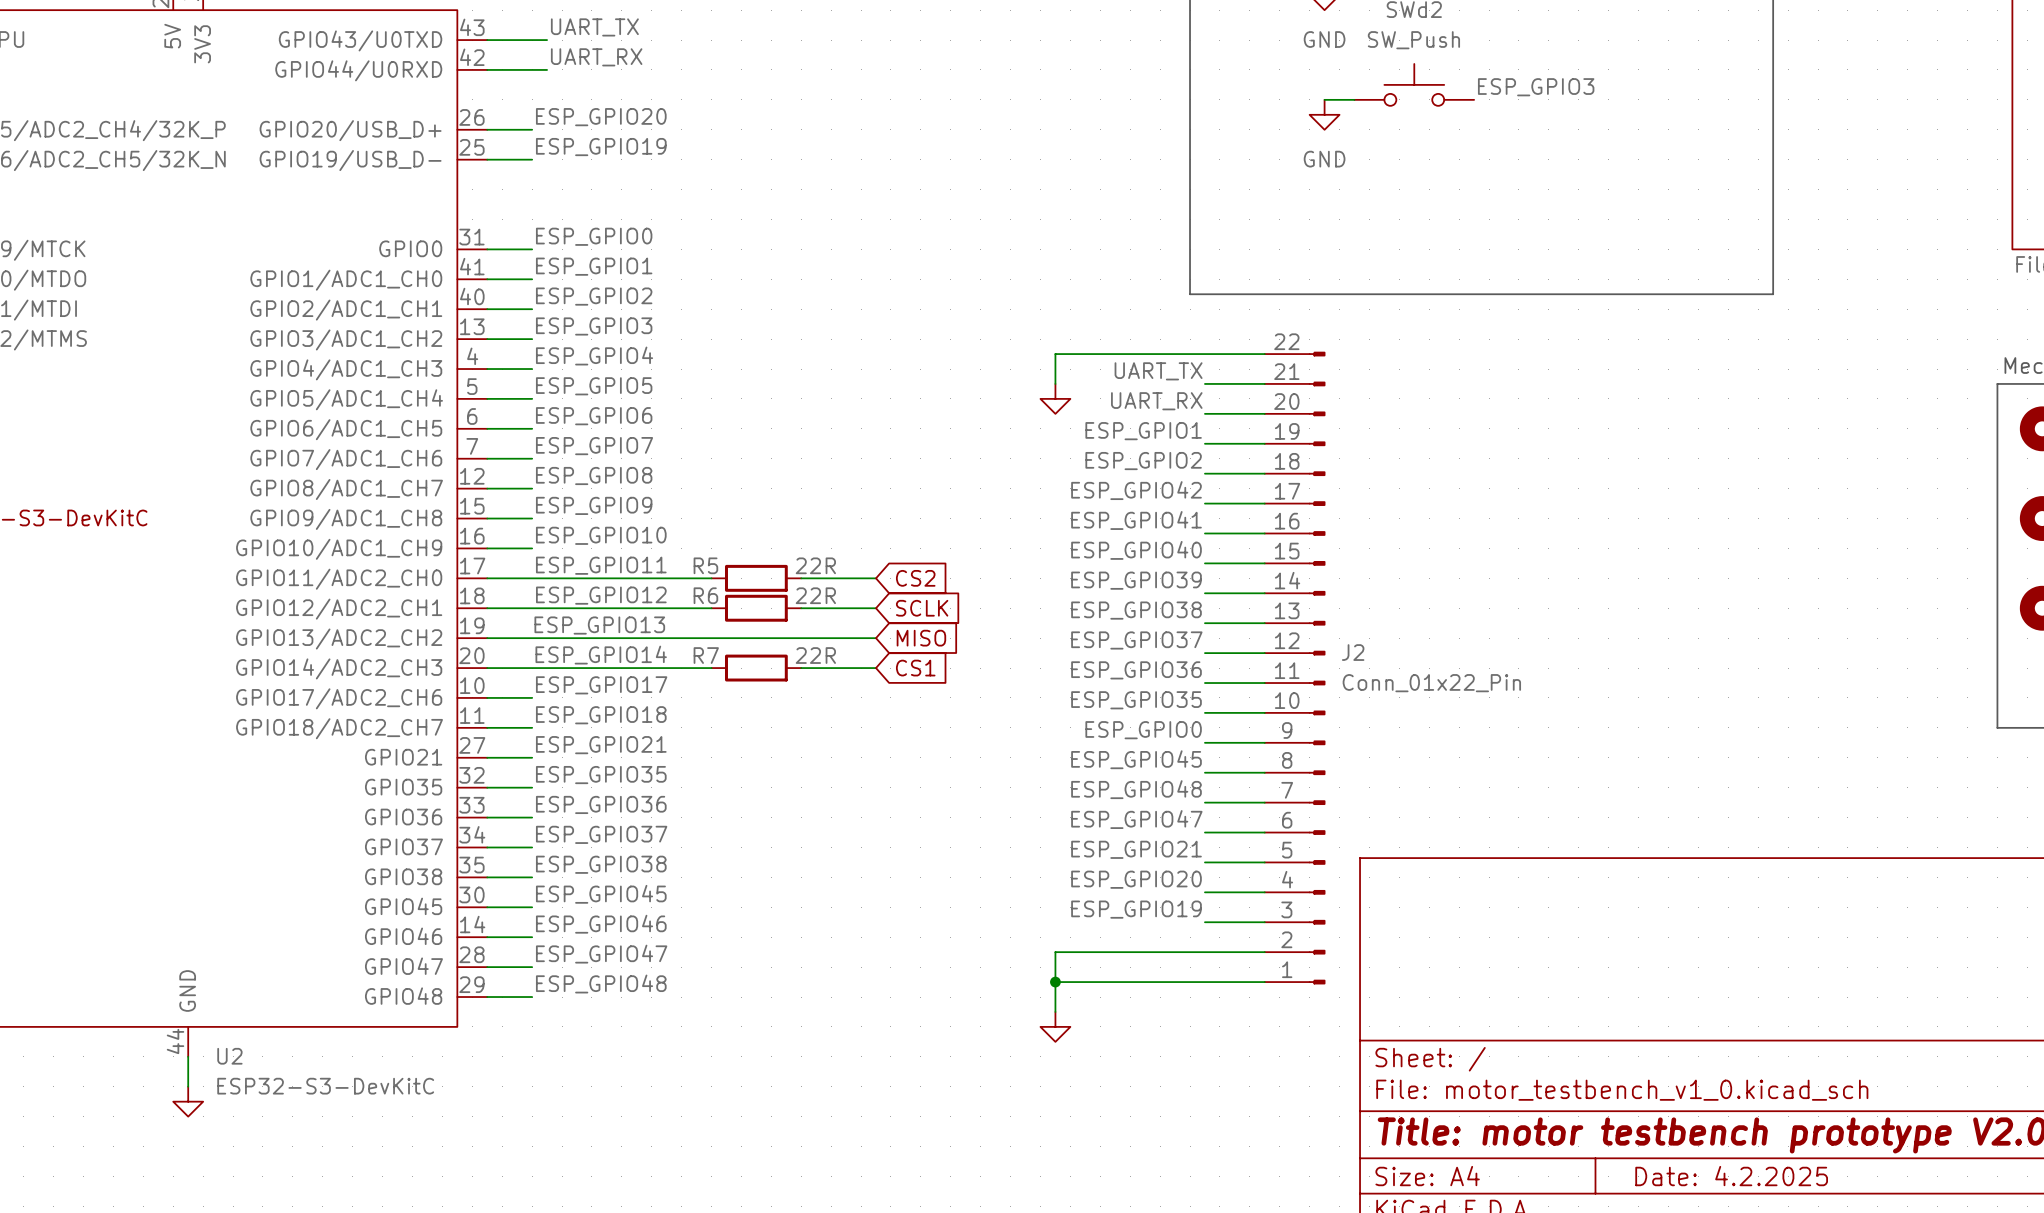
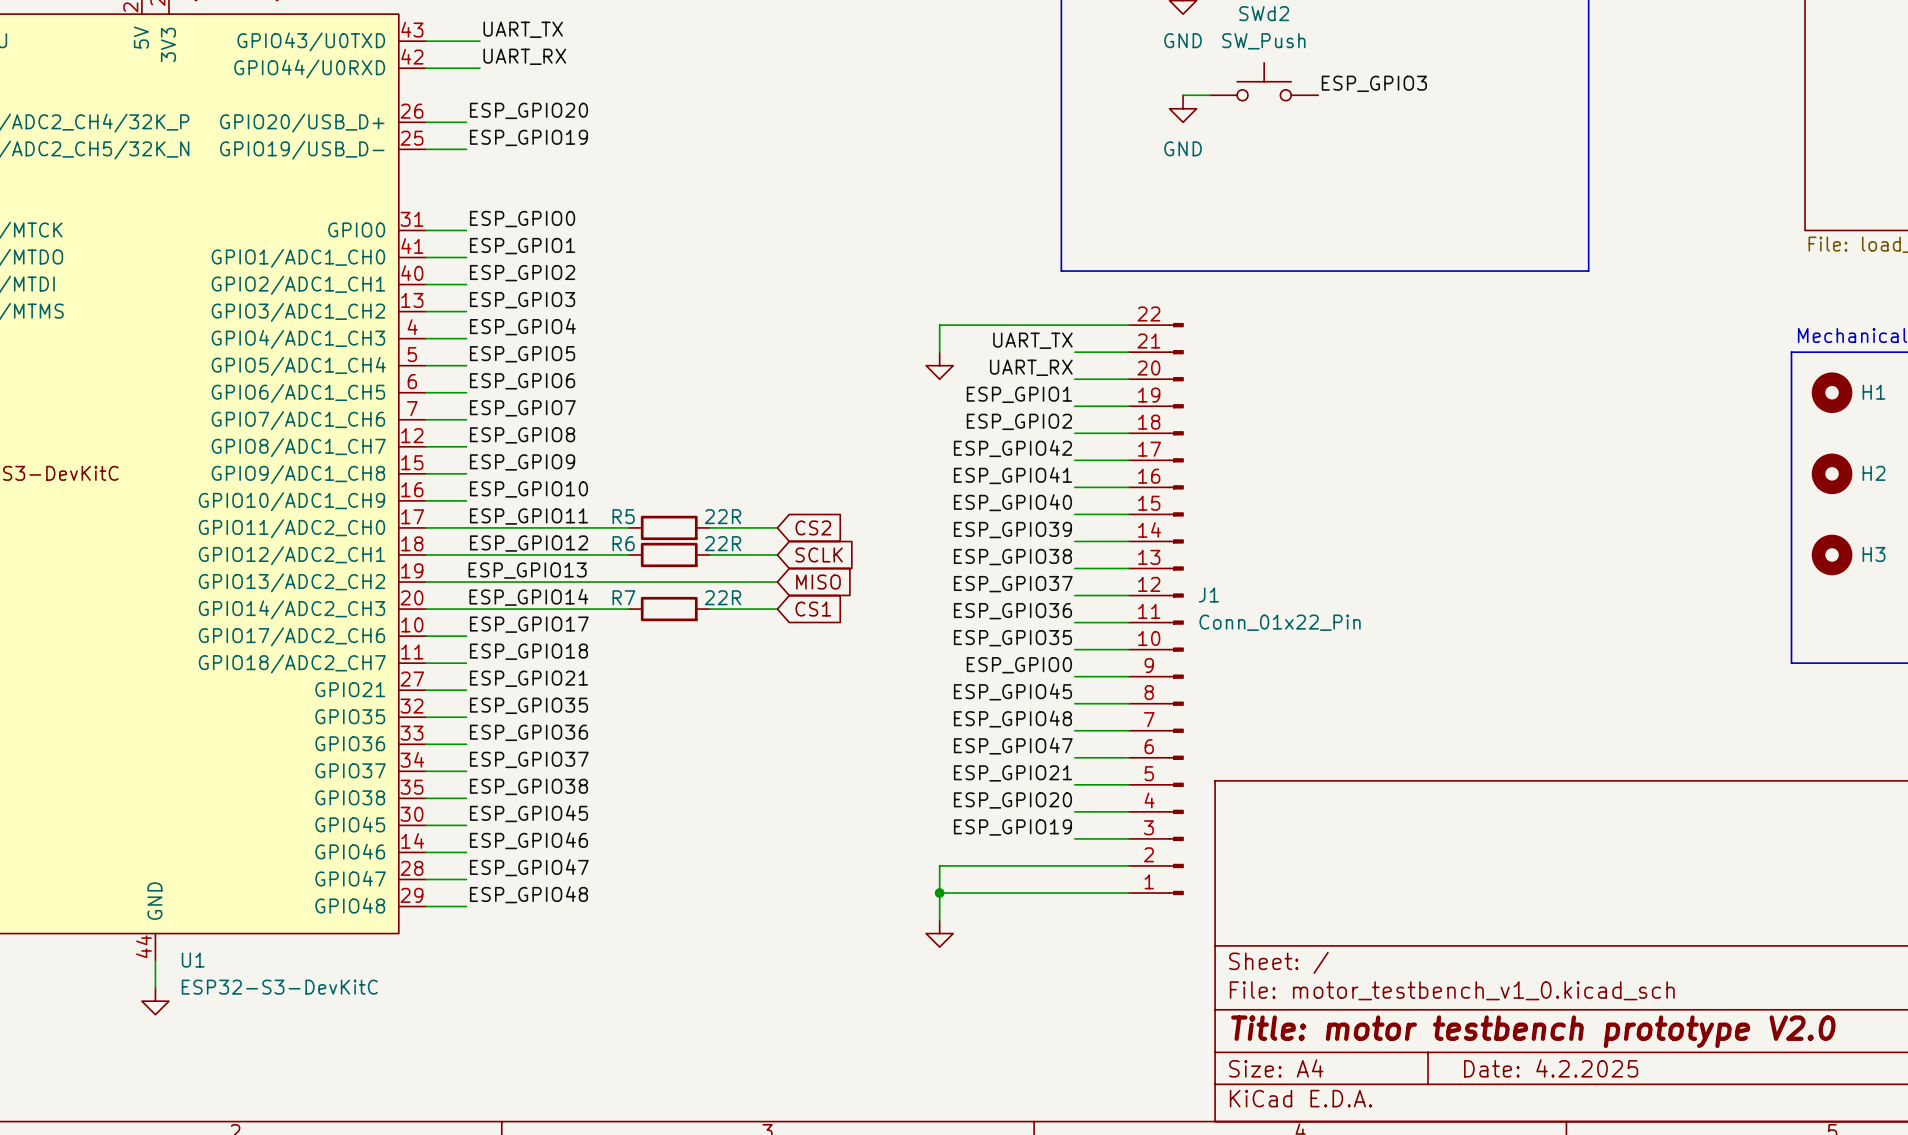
J2 name: J2 (1353, 652) -> J1 (1208, 595)
U2 name: U2 (229, 1056) -> U1 (193, 960)

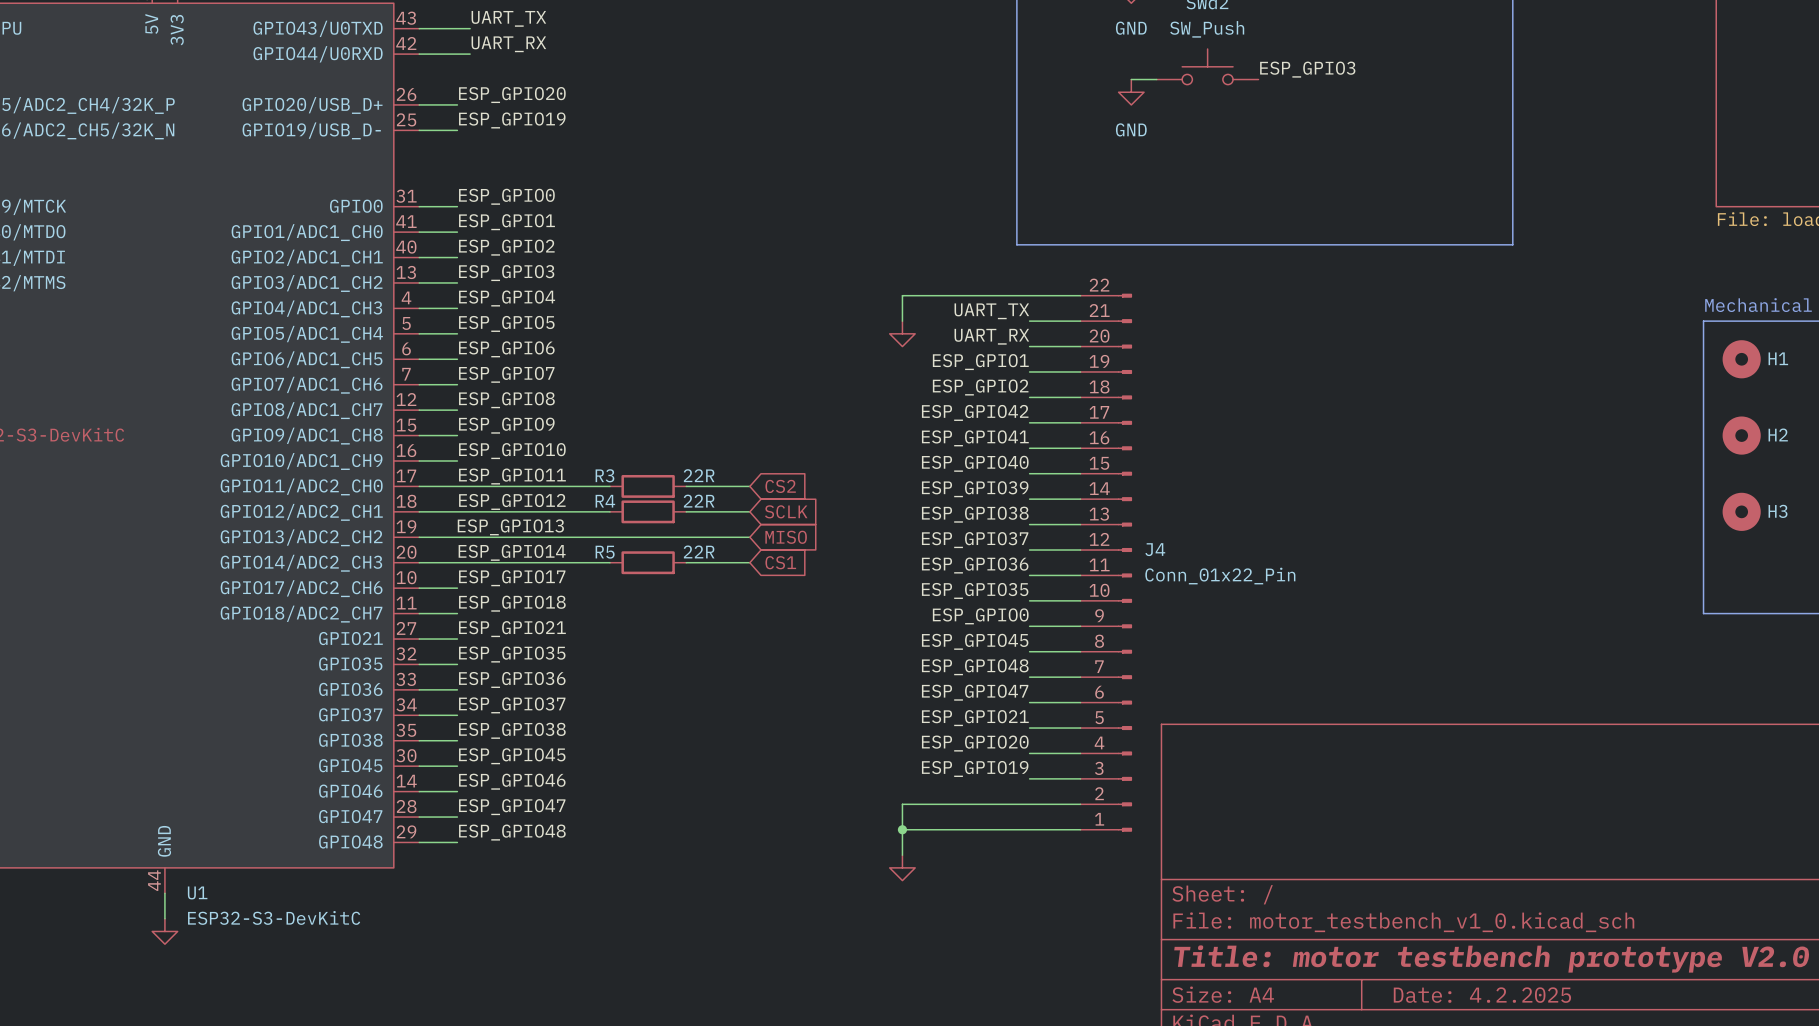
R5 name: R5 (623, 516) -> R3 (604, 475)
R6 name: R6 (623, 543) -> R4 (605, 501)
J1 name: J1 (1208, 595) -> J4 (1155, 549)
R7 name: R7 (623, 597) -> R5 (605, 552)

